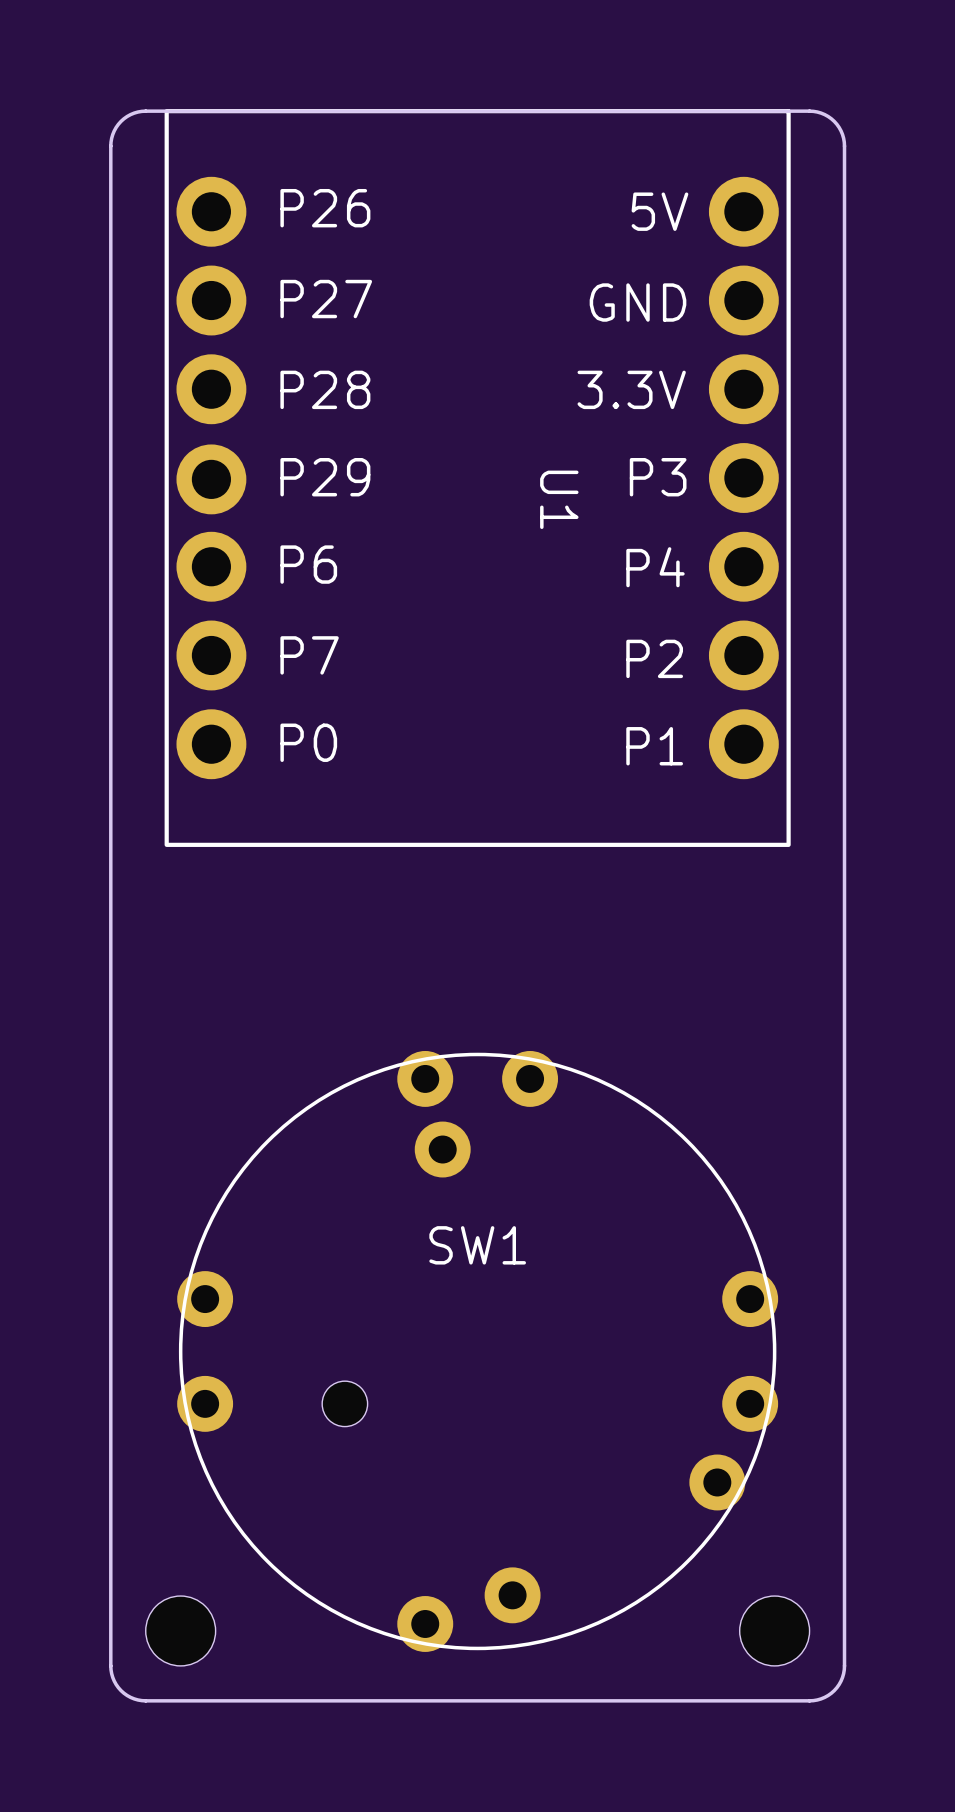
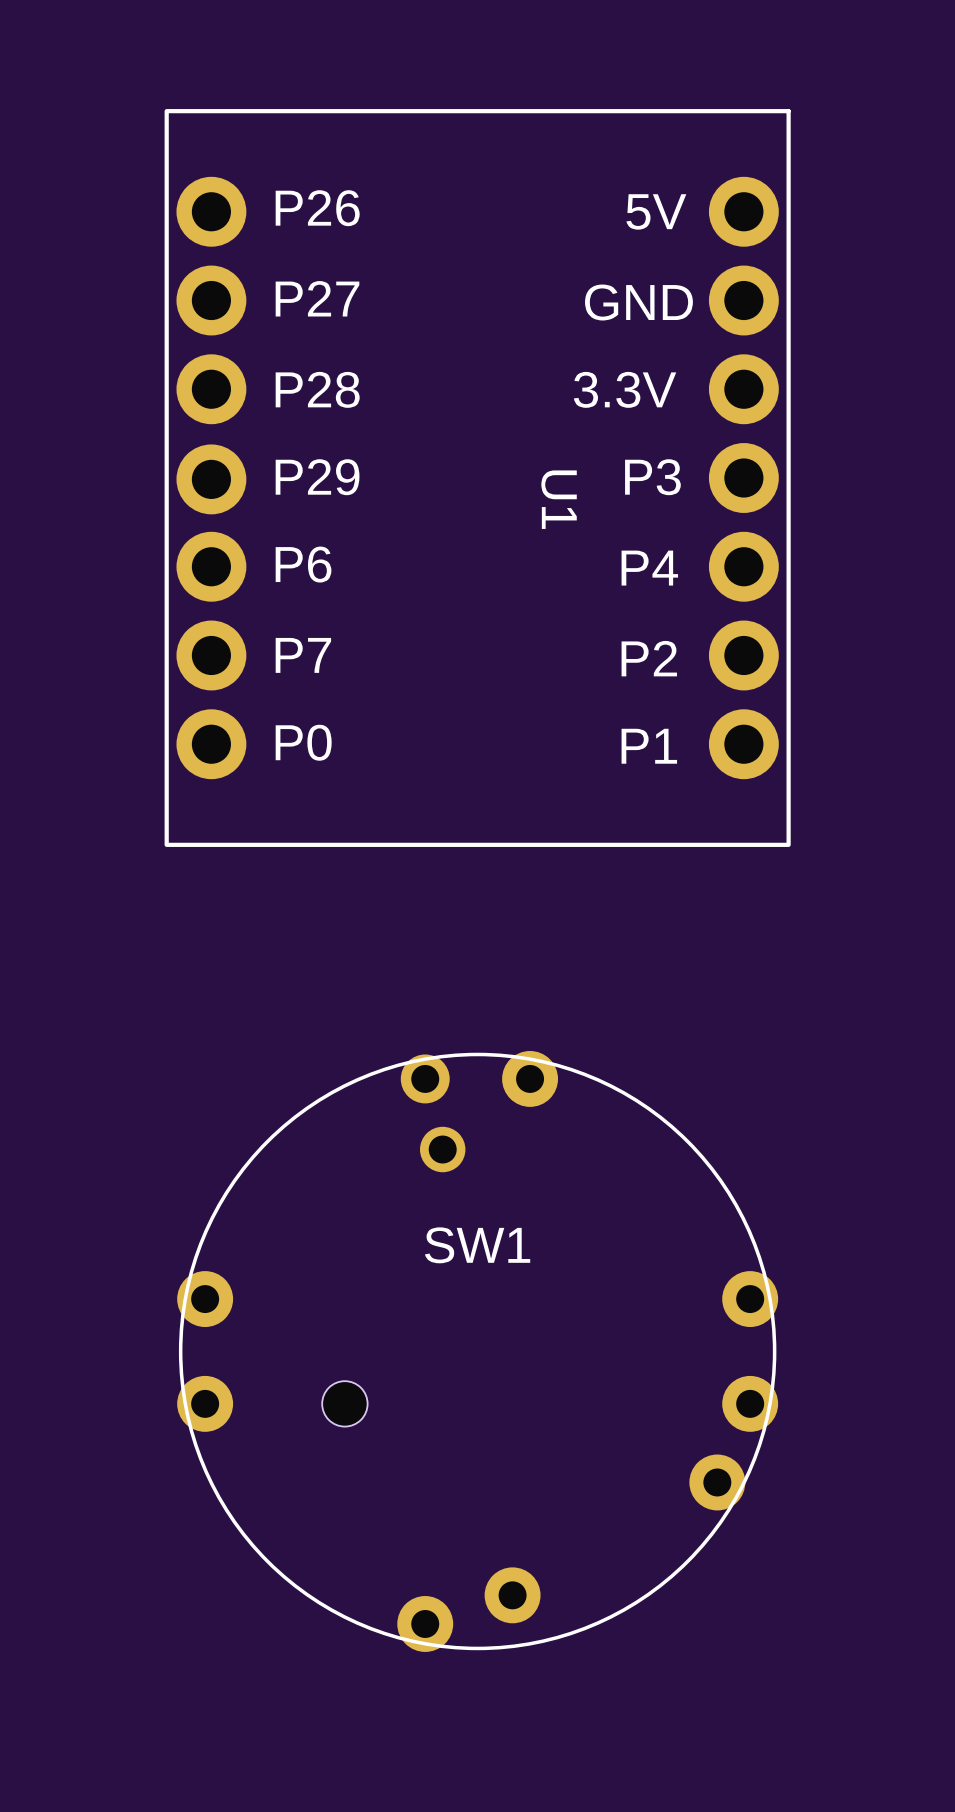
board edge: (145, 111) (809, 111) (828, 116) (841, 130) (844, 146) (844, 1665) (839, 1684) (824, 1697) (809, 1700) (145, 1700) (127, 1695) (114, 1681) (110, 1665) (110, 146) (112, 134) (121, 121) (134, 113) (145, 111) -> none
SW1 footprint: [177, 1050, 779, 1652] -> [177, 1050, 779, 1652]
part: (180, 1630) -> none
part: (774, 1630) -> none

